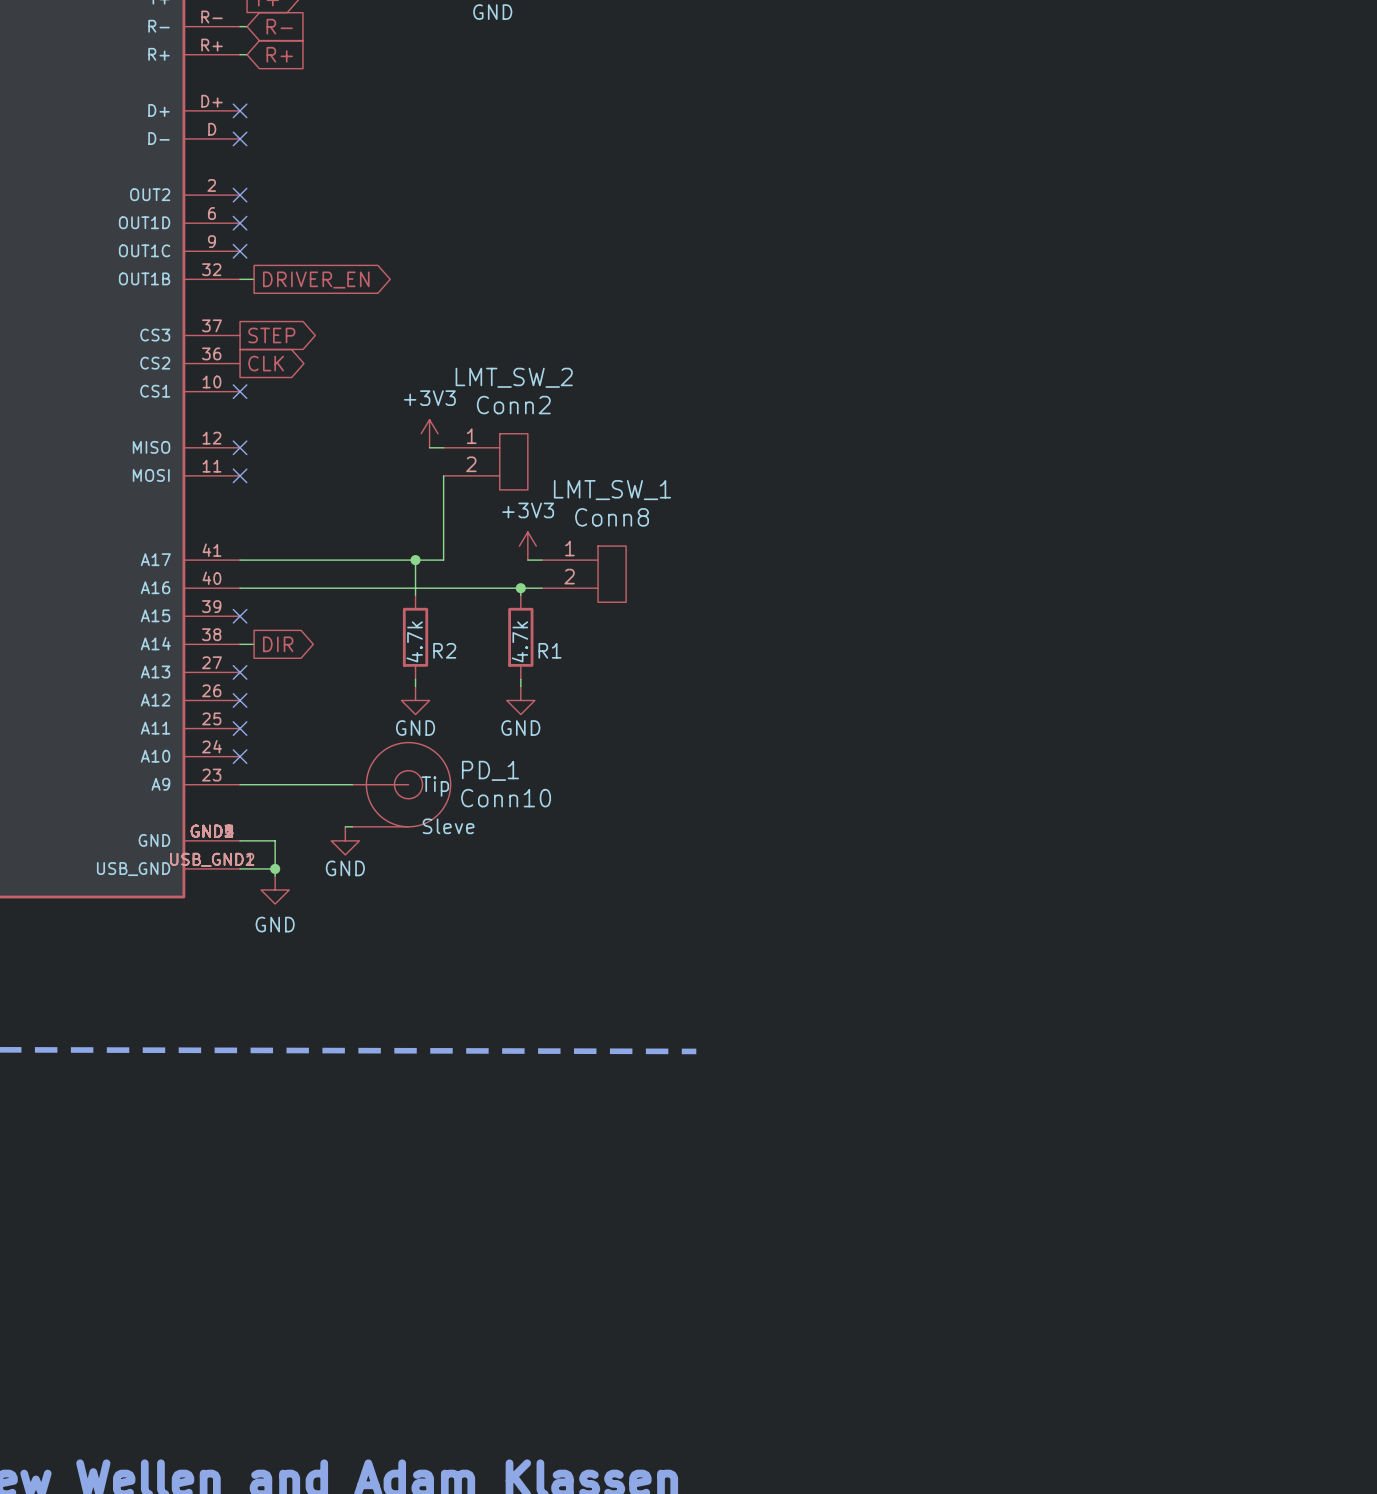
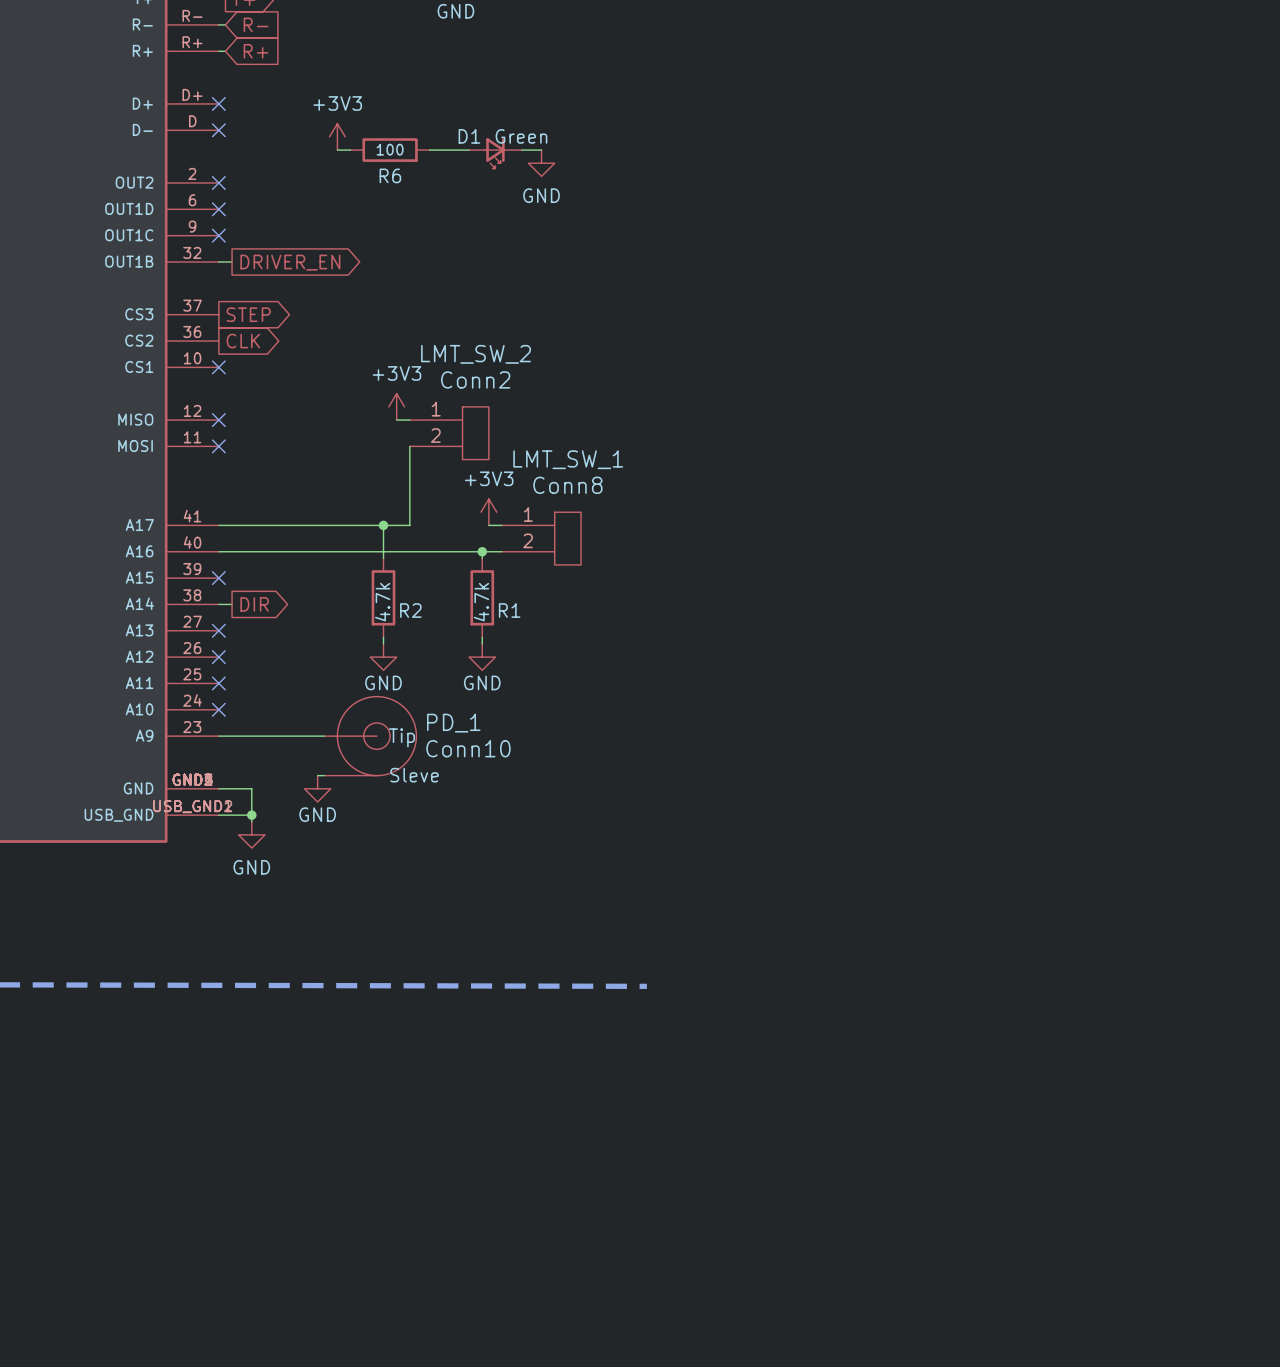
power symbol: none -> +3V3 (337, 136)
wire: none -> (337, 150) (350, 150)
R6: none -> 100 (390, 150)
wire: none -> (429, 150) (469, 150)
wire: none -> (521, 150) (541, 150)
D1: none -> Green (495, 153)
power symbol: none -> GND (541, 163)

